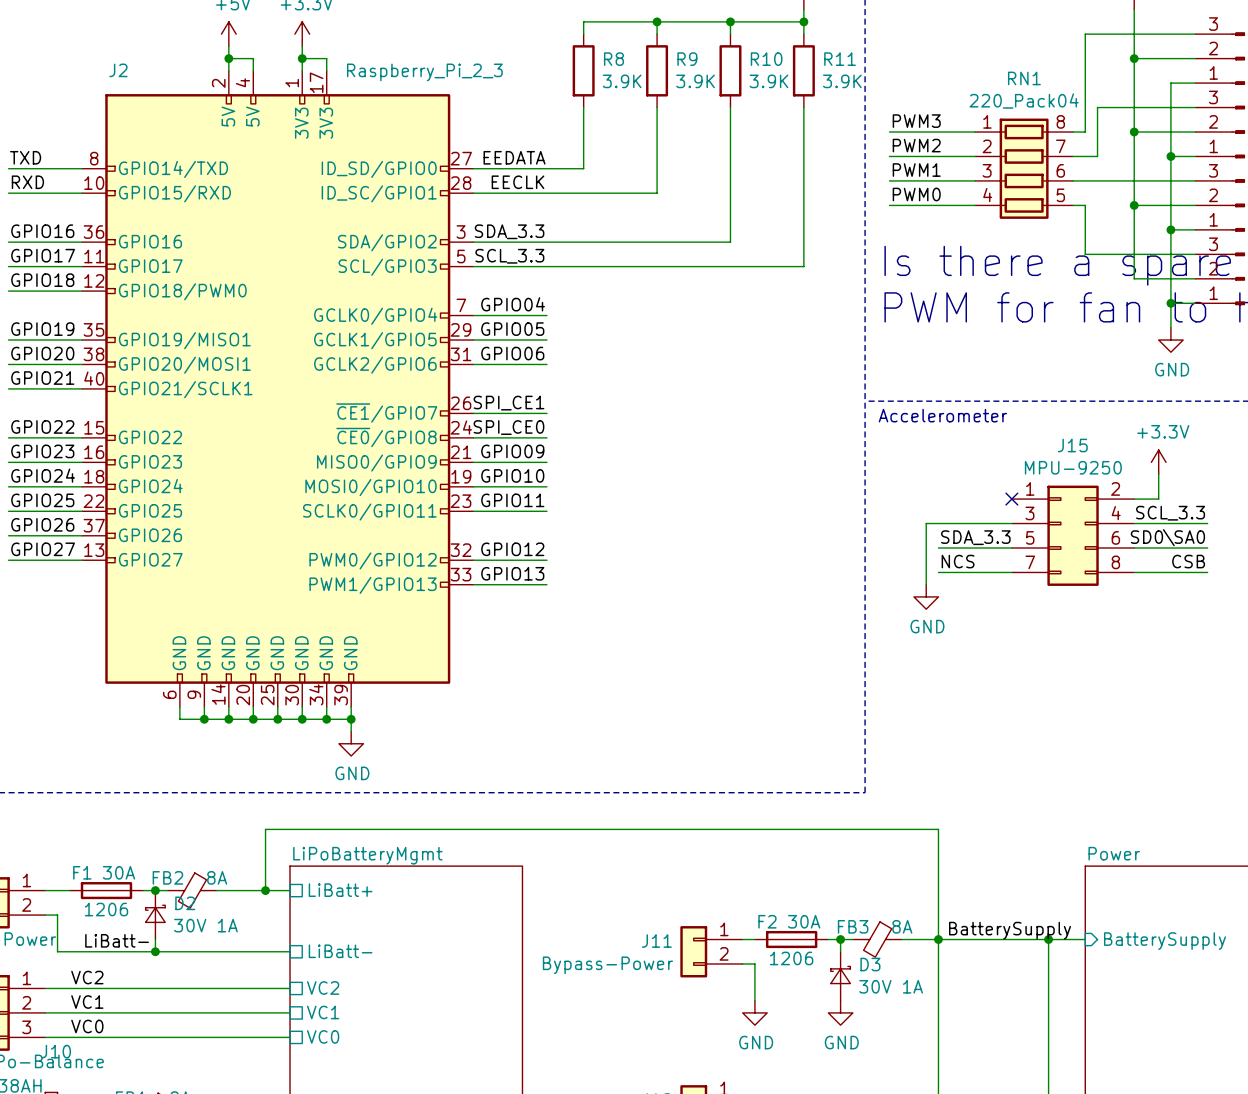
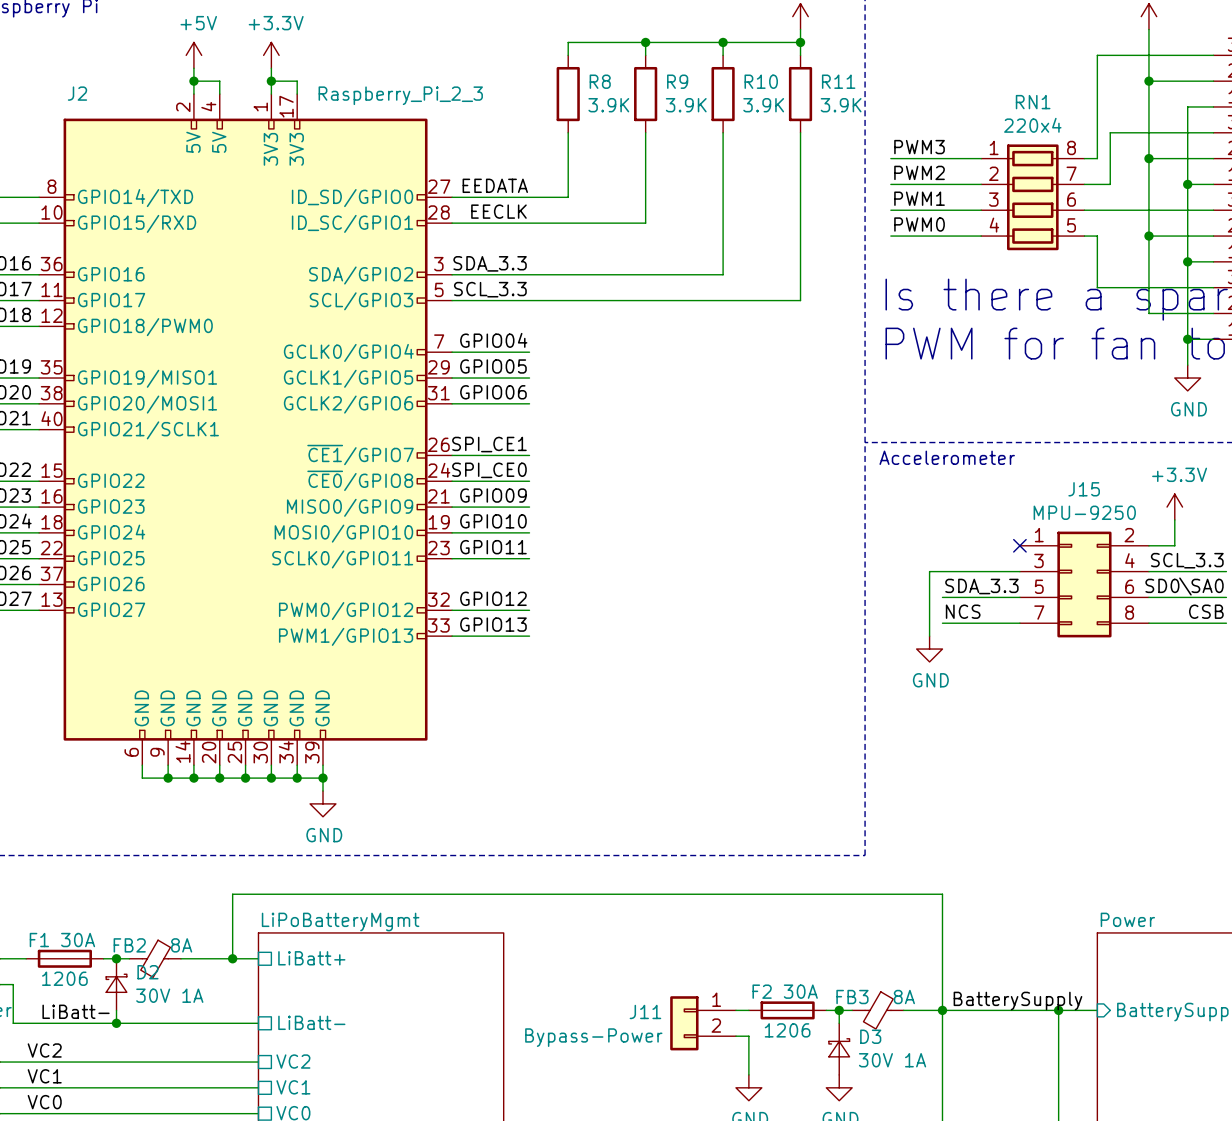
RN1 value: 220_Pack04 (1024, 101) -> 220x4 (1032, 125)

